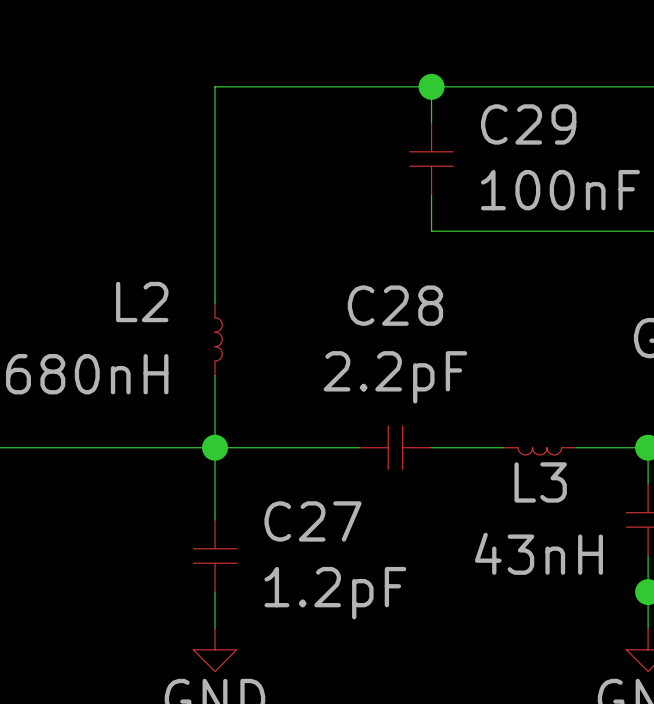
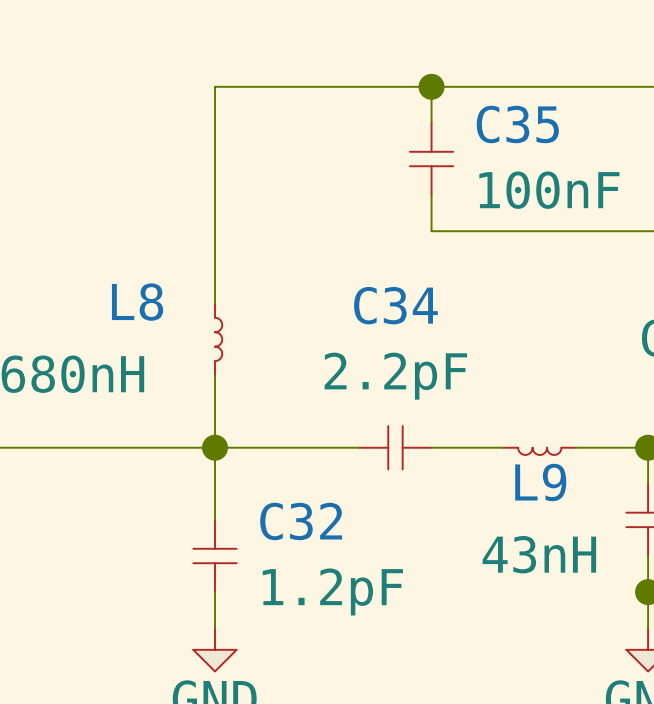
C29 name: C29 (528, 124) -> C35 (517, 124)
L2 name: L2 (142, 302) -> L8 (137, 302)
C28 name: C28 (395, 305) -> C34 (395, 305)
L3 name: L3 (540, 482) -> L9 (540, 482)
C27 name: C27 (312, 521) -> C32 (301, 521)

